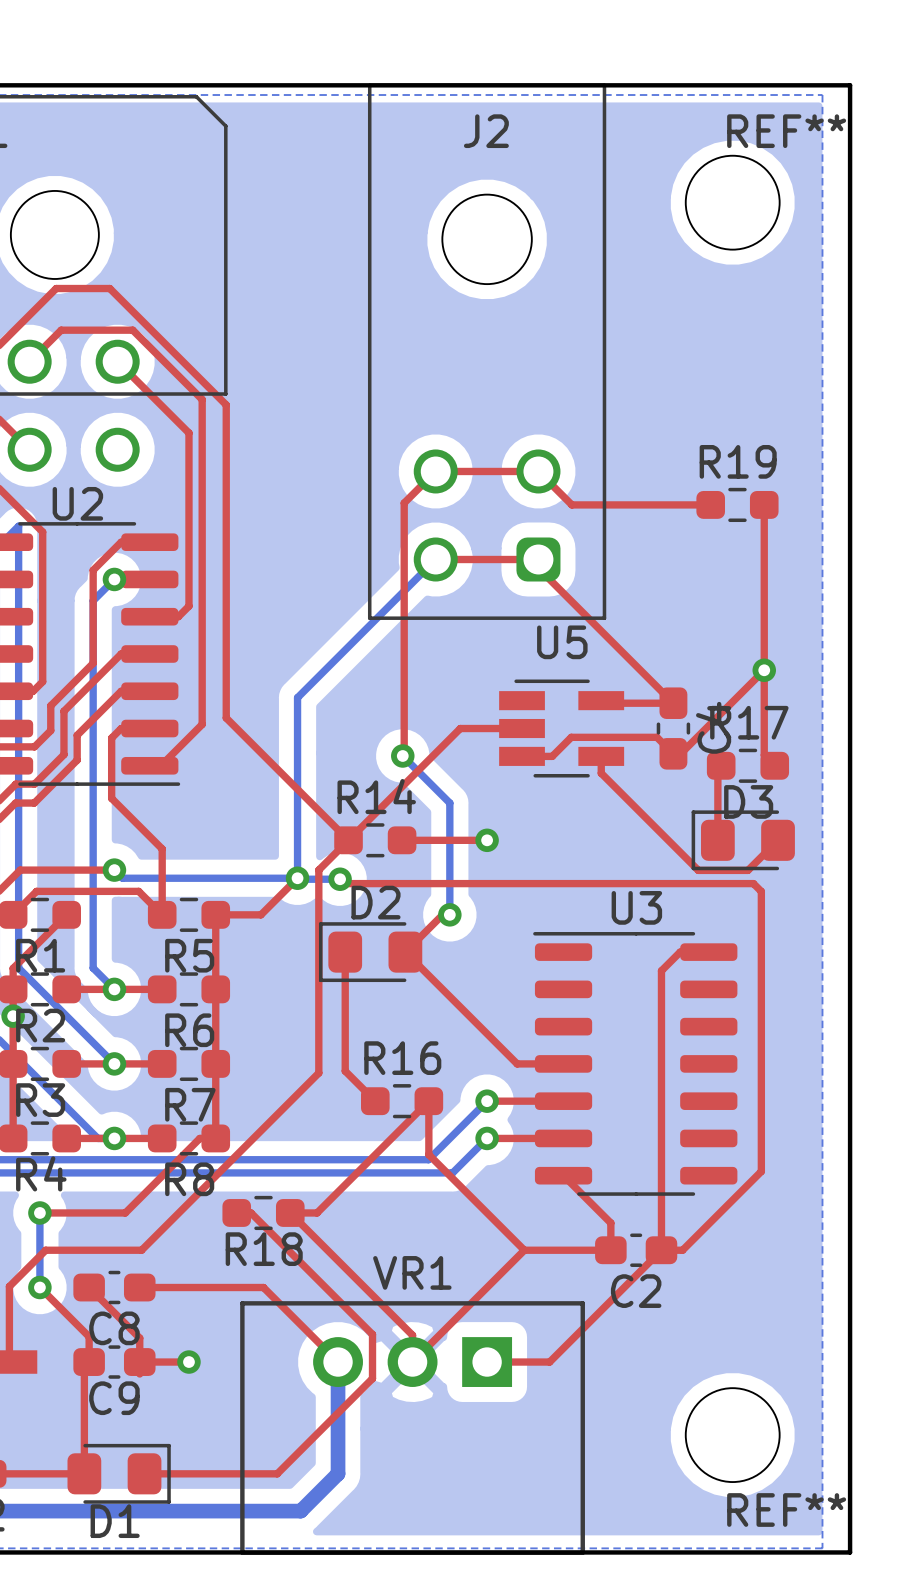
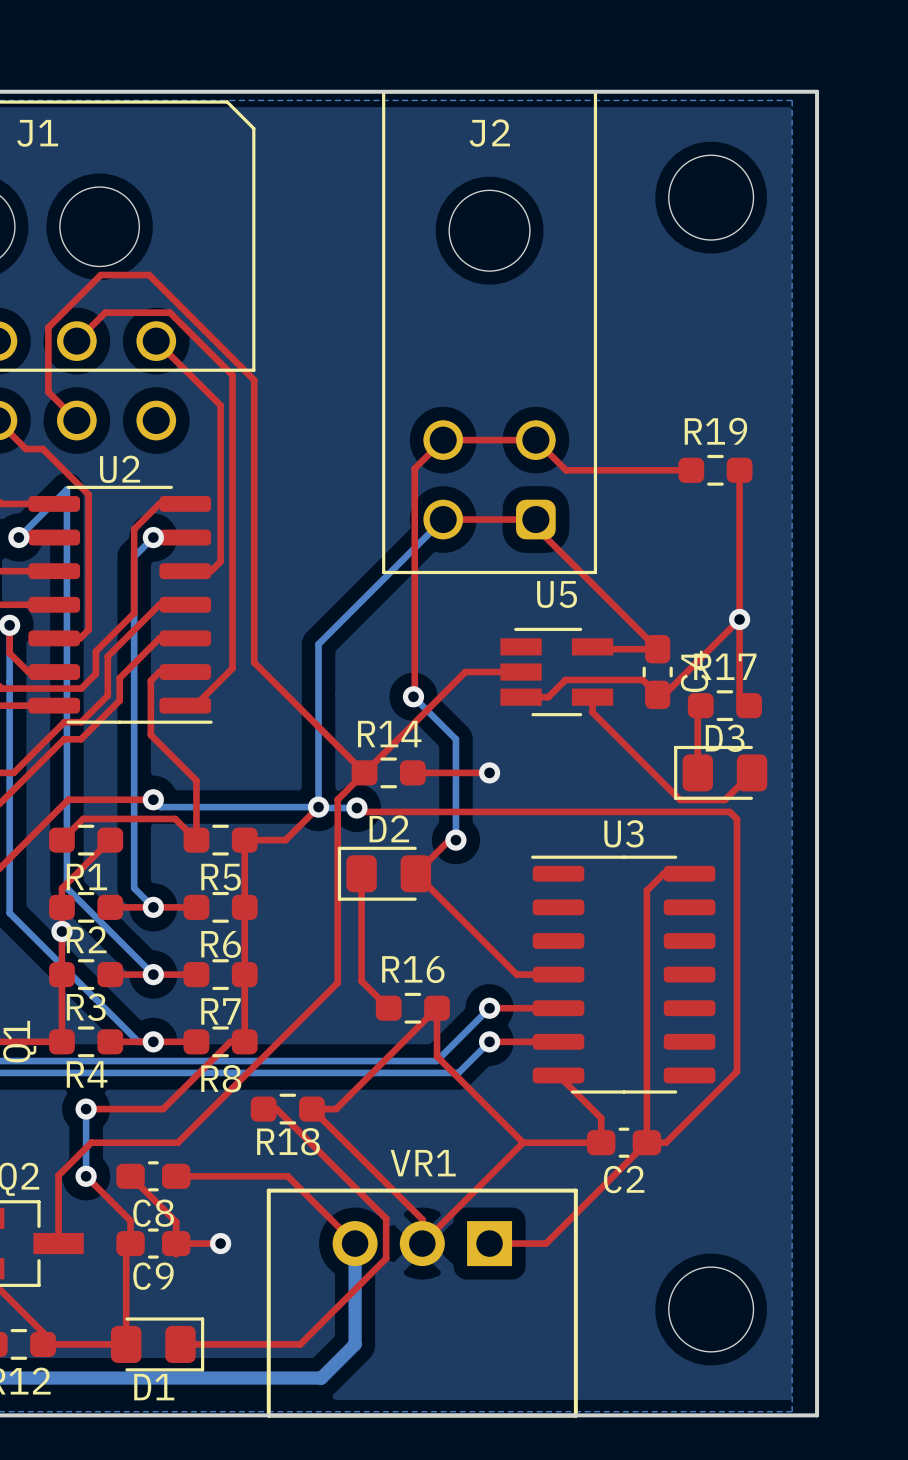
REF** name: REF** (786, 131) -> none
REF** name: REF** (786, 1510) -> none

